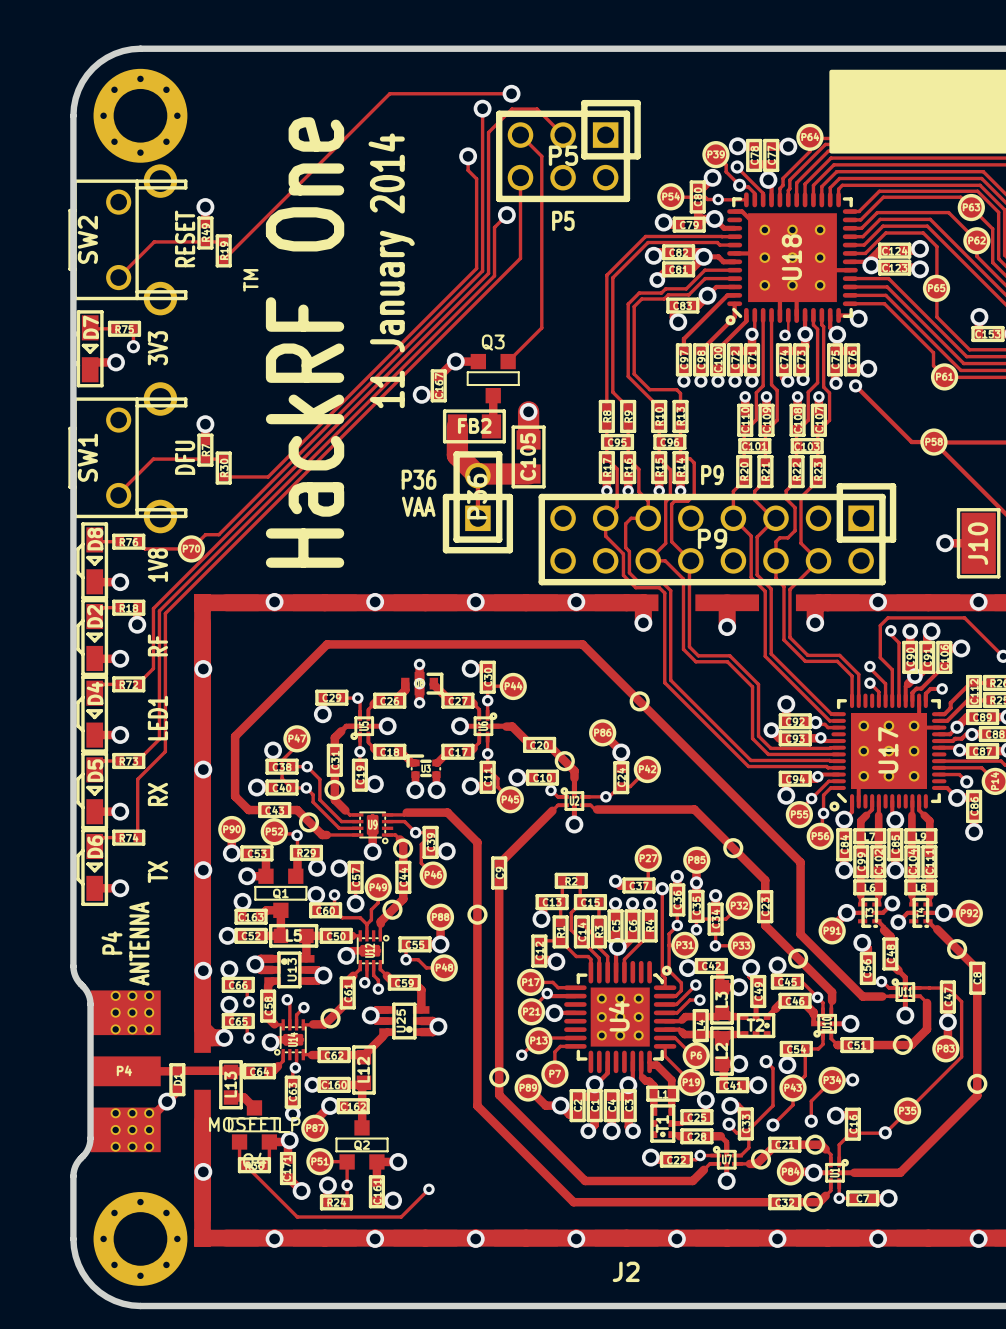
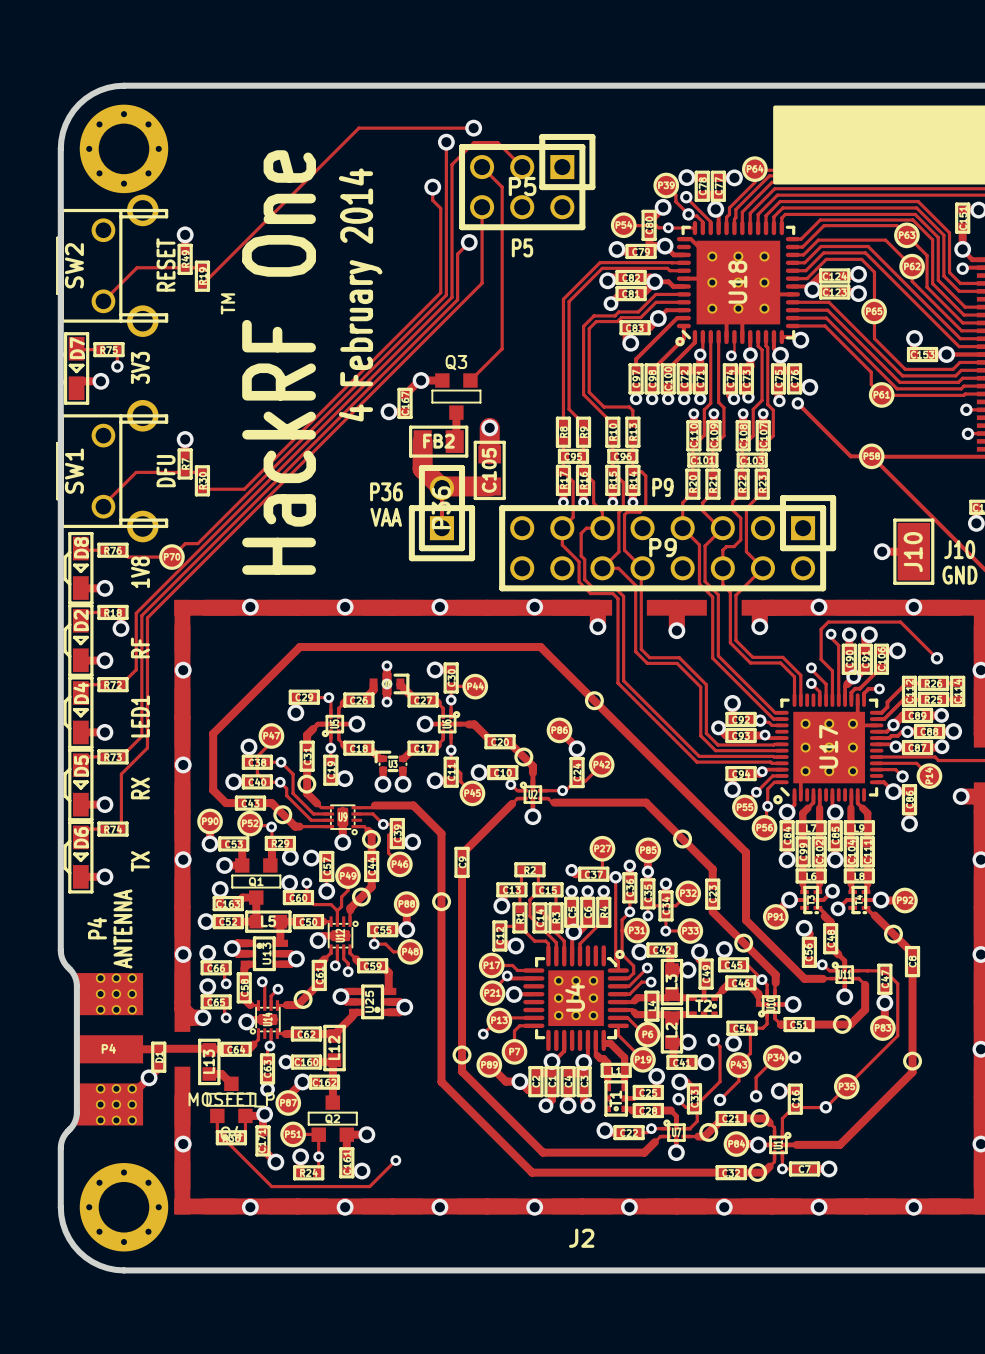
text: 11 January 2014 (391, 270) -> 4 February 2014 (360, 294)

